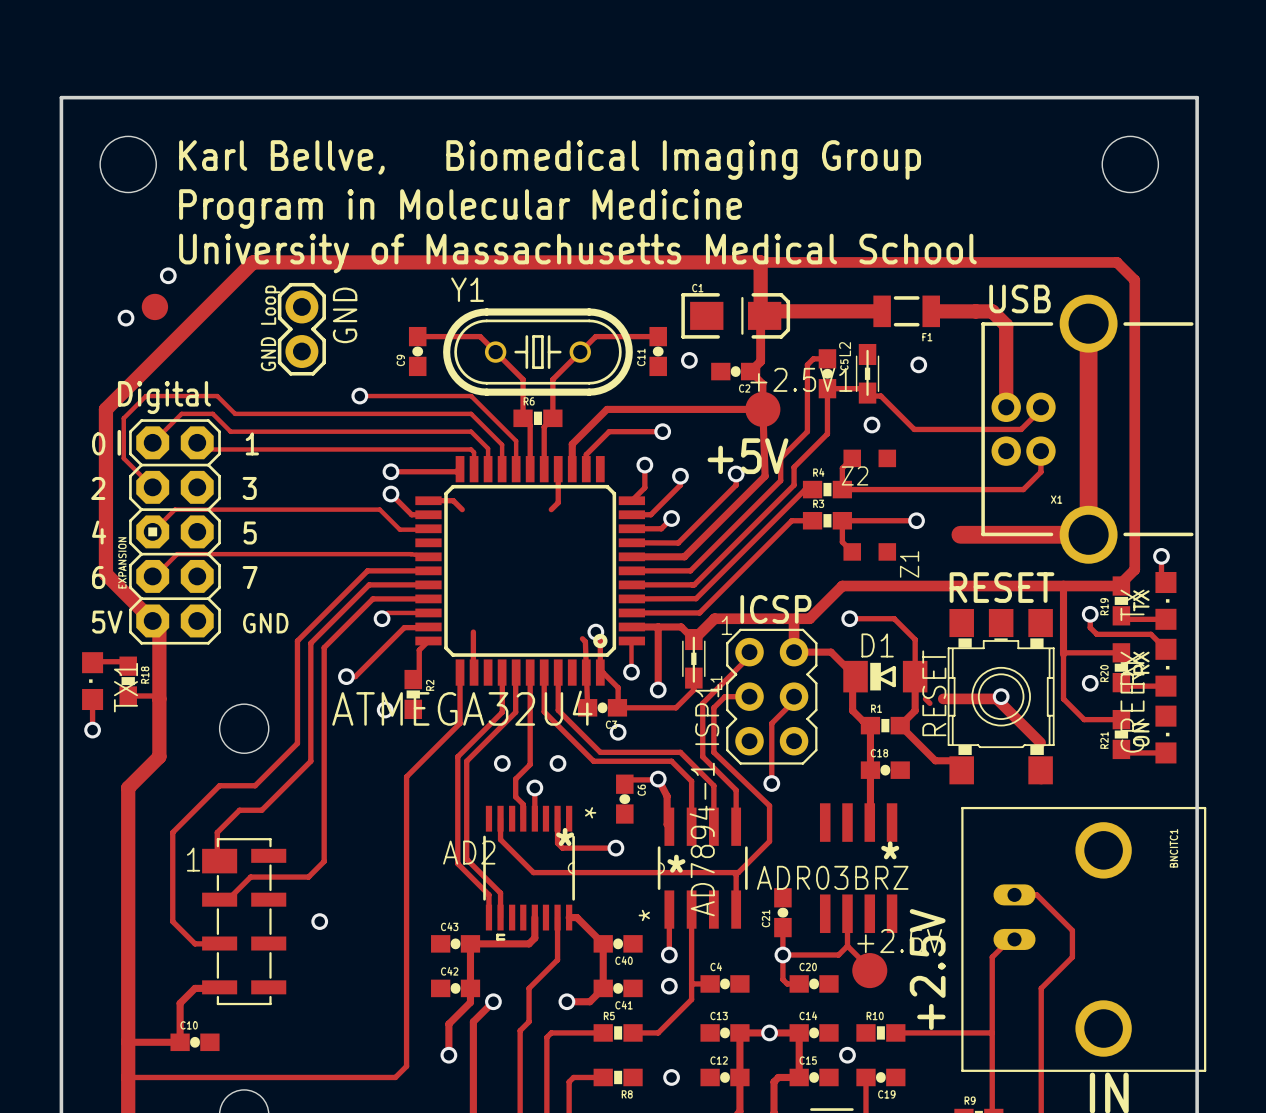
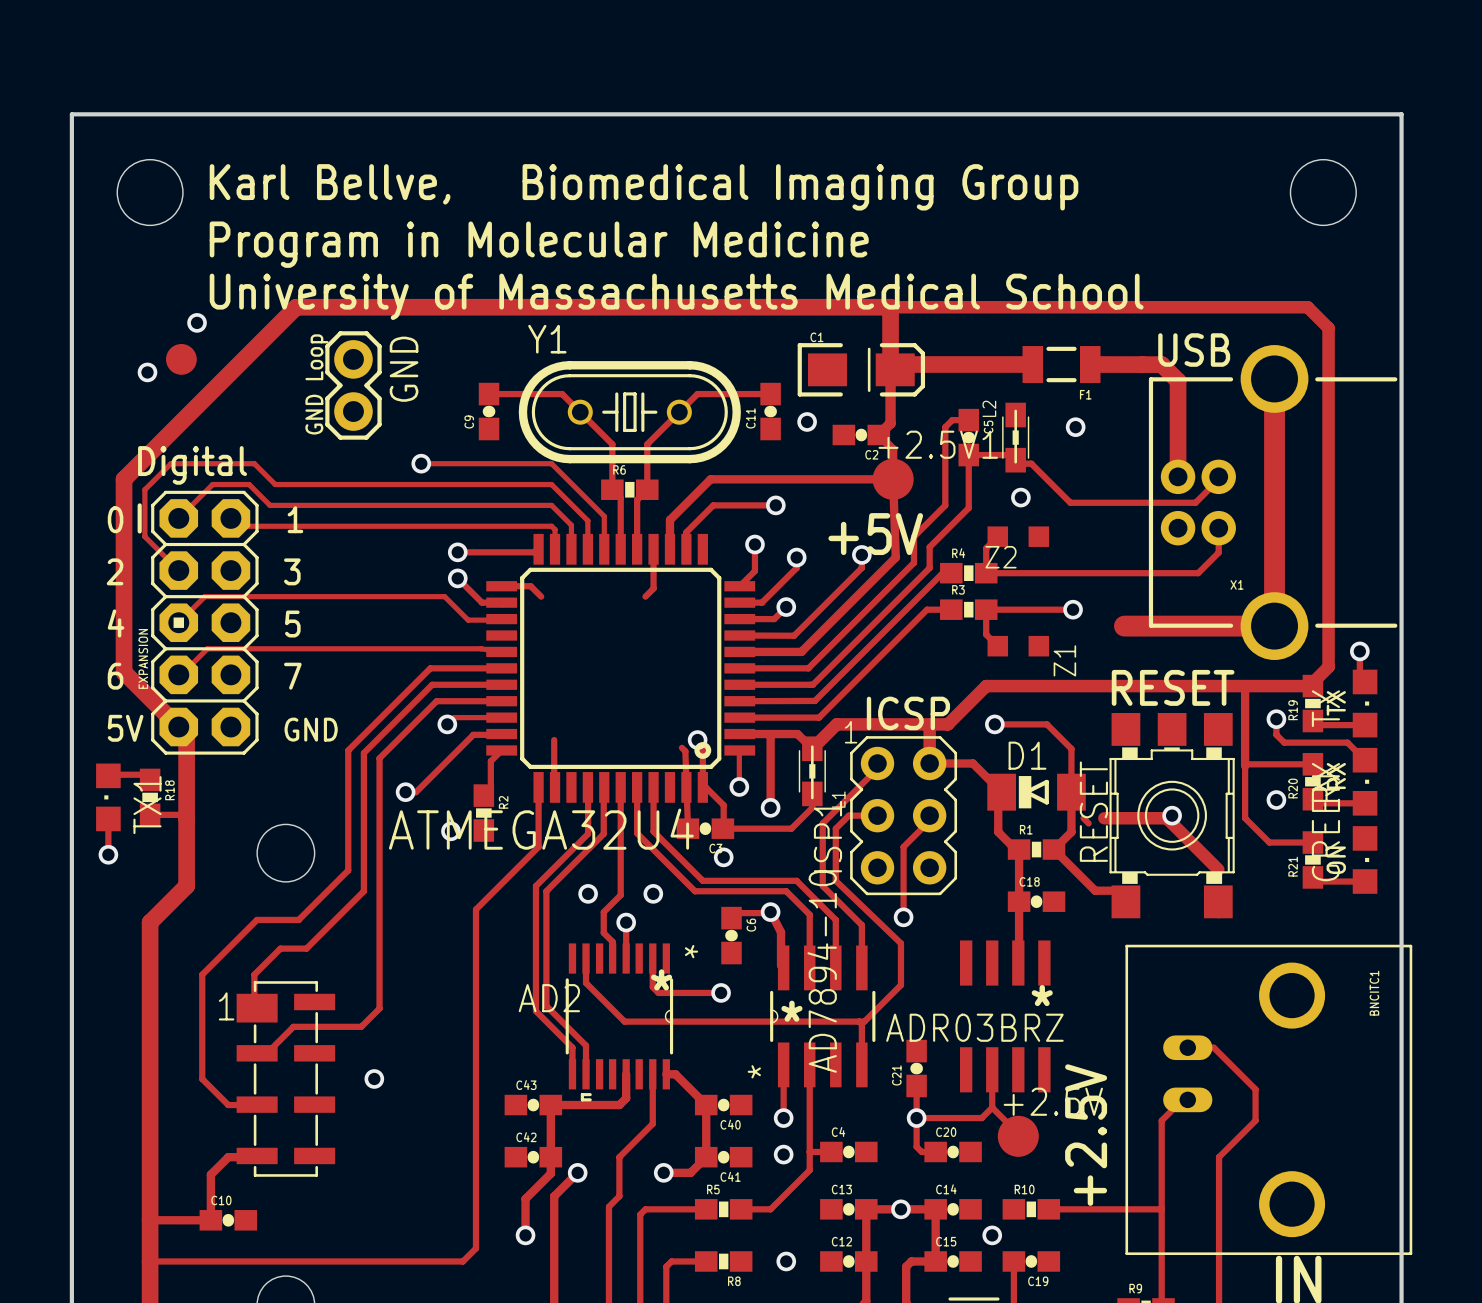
AD7894-1 name: AD7894-1 (702, 839) -> AD7894-10 (822, 971)

